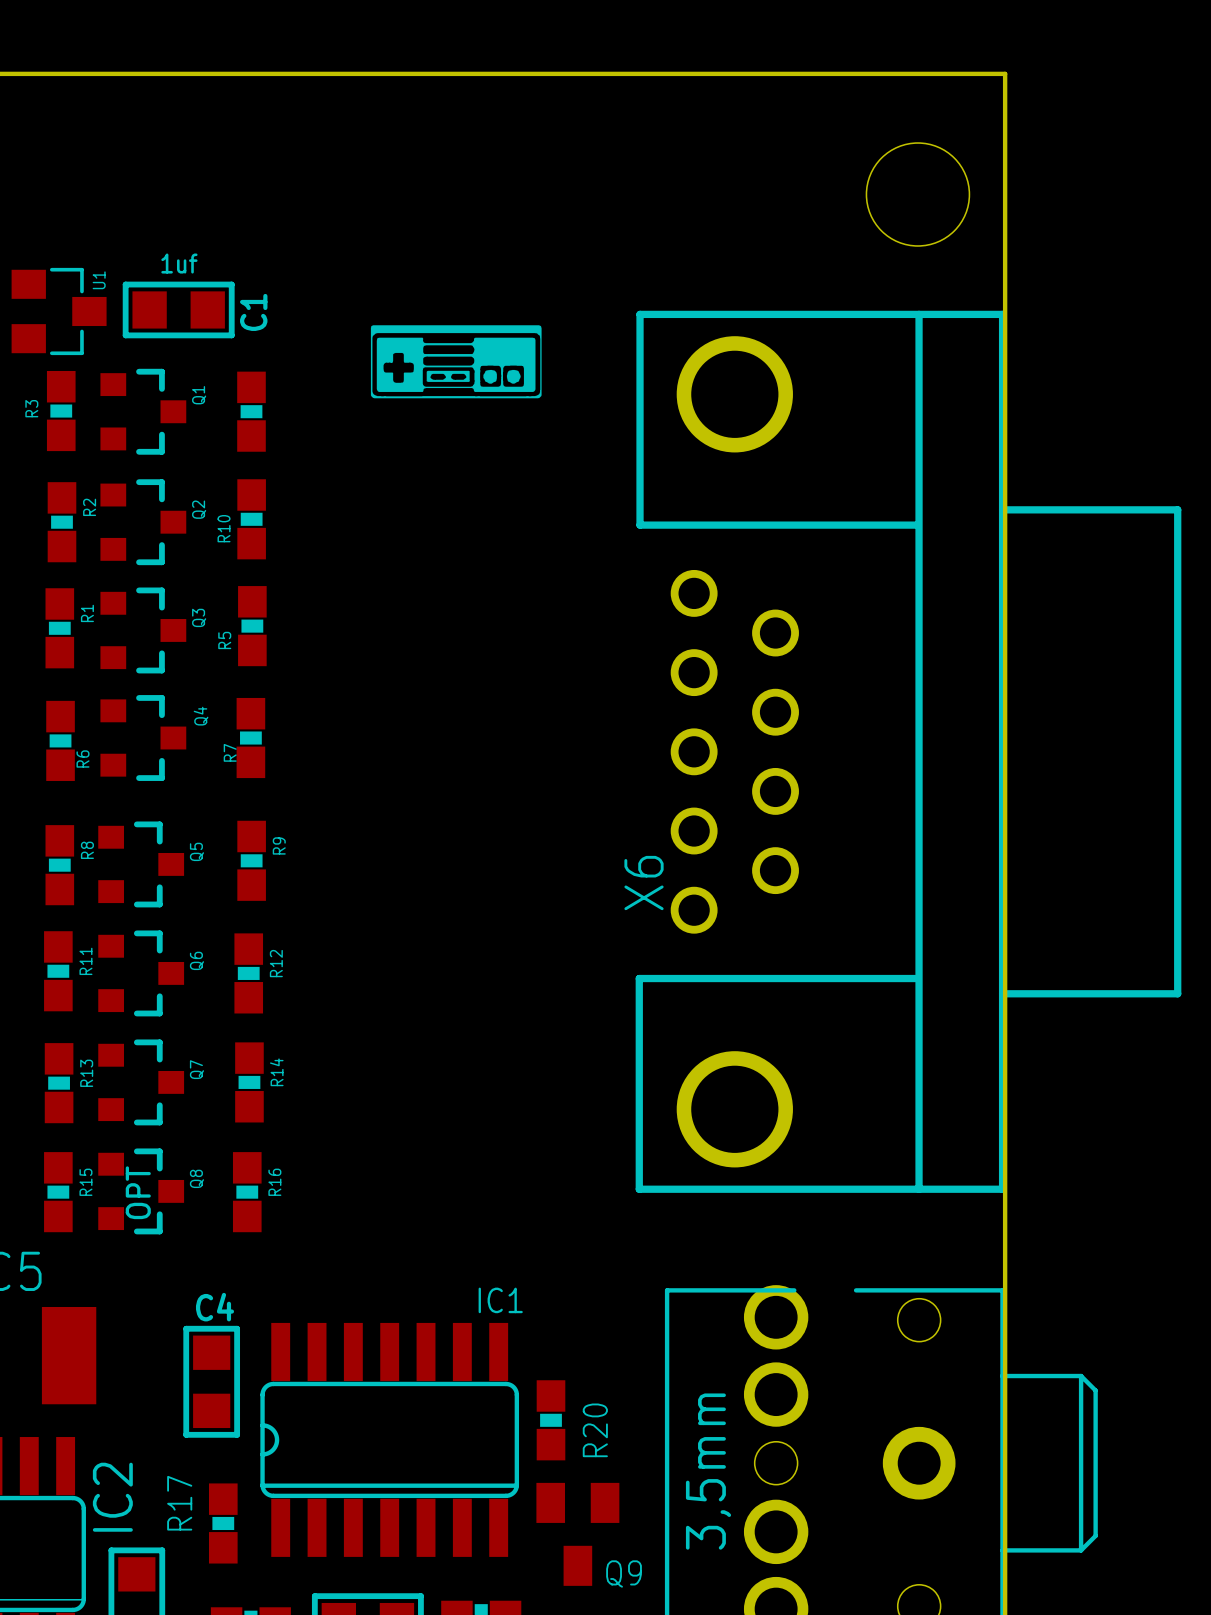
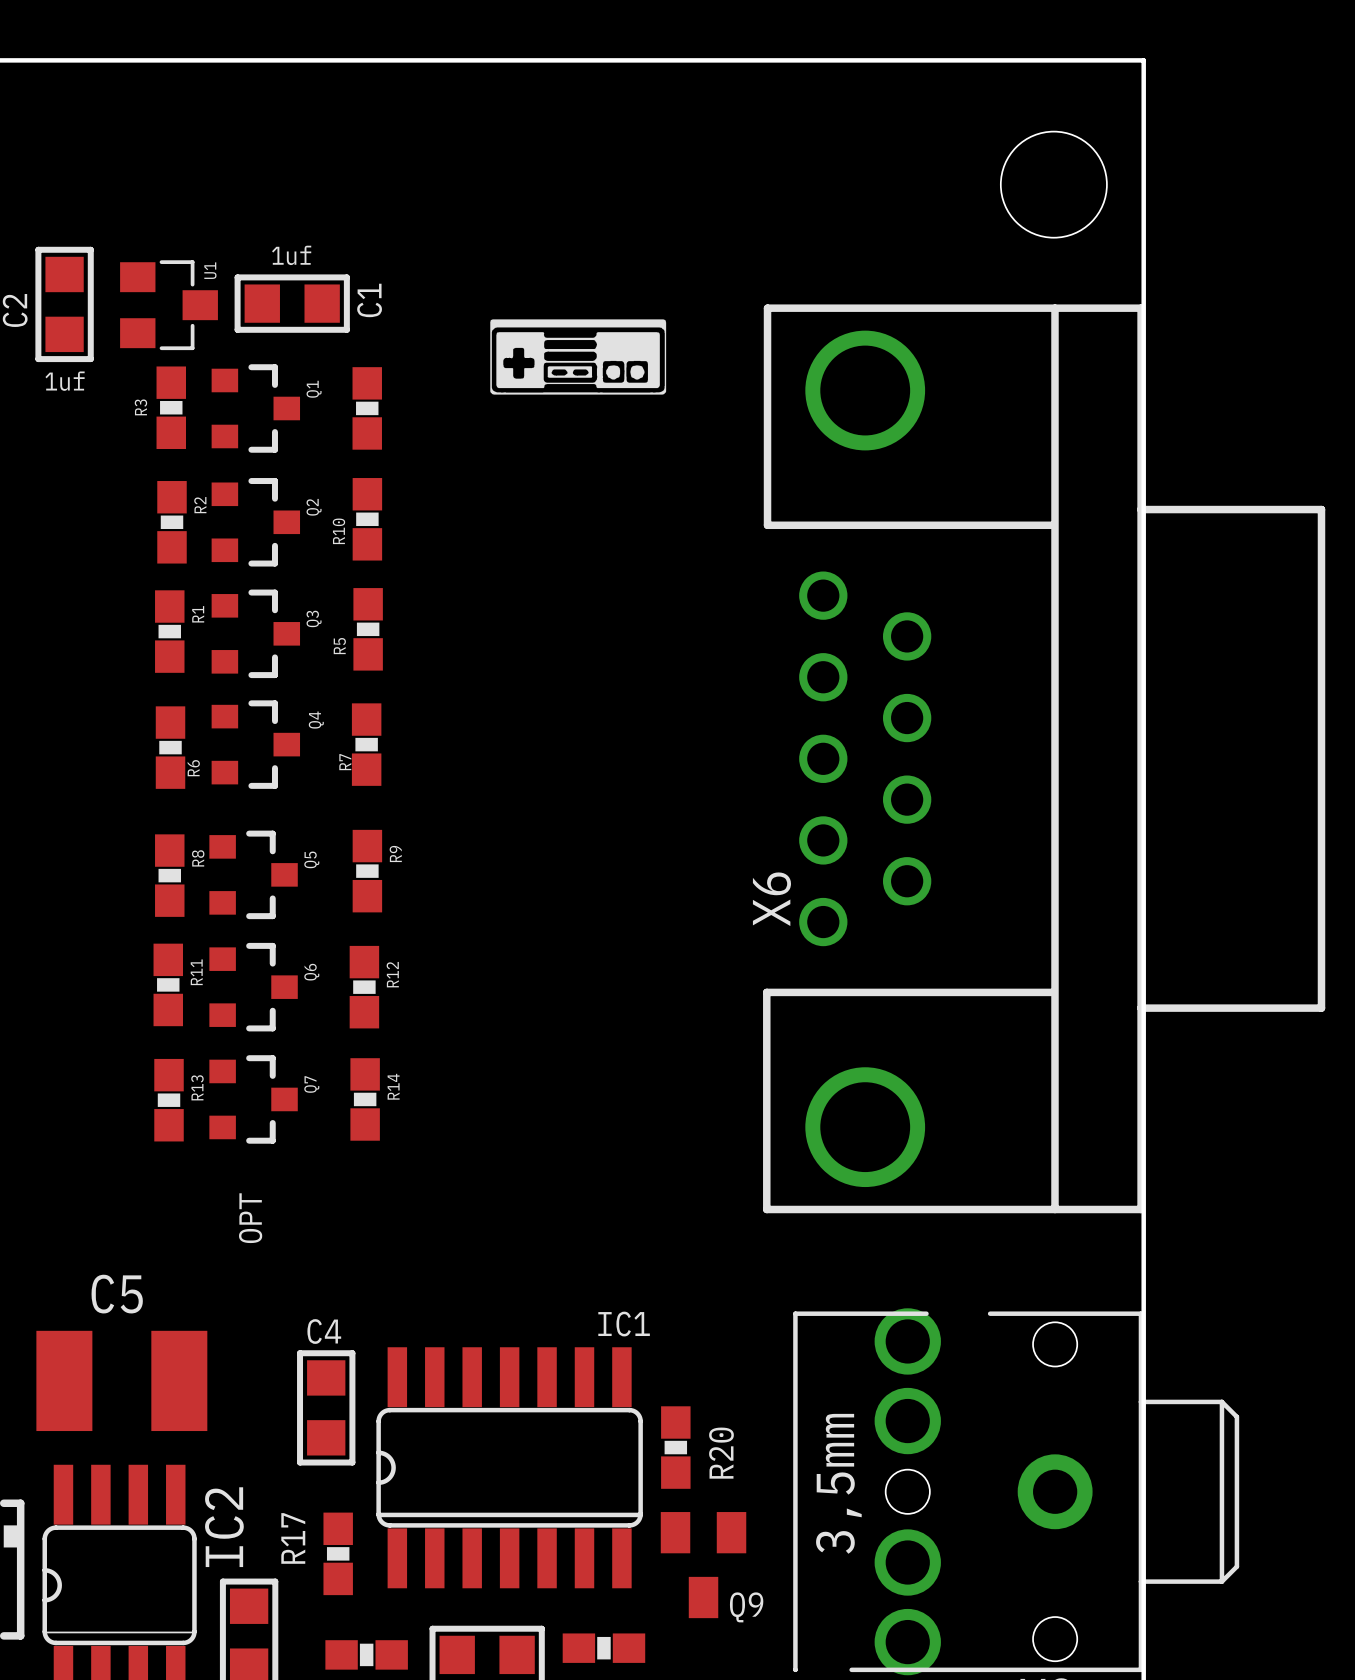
Q8: (141, 1191) -> none
R15: (58, 1192) -> none
R16: (247, 1192) -> none

